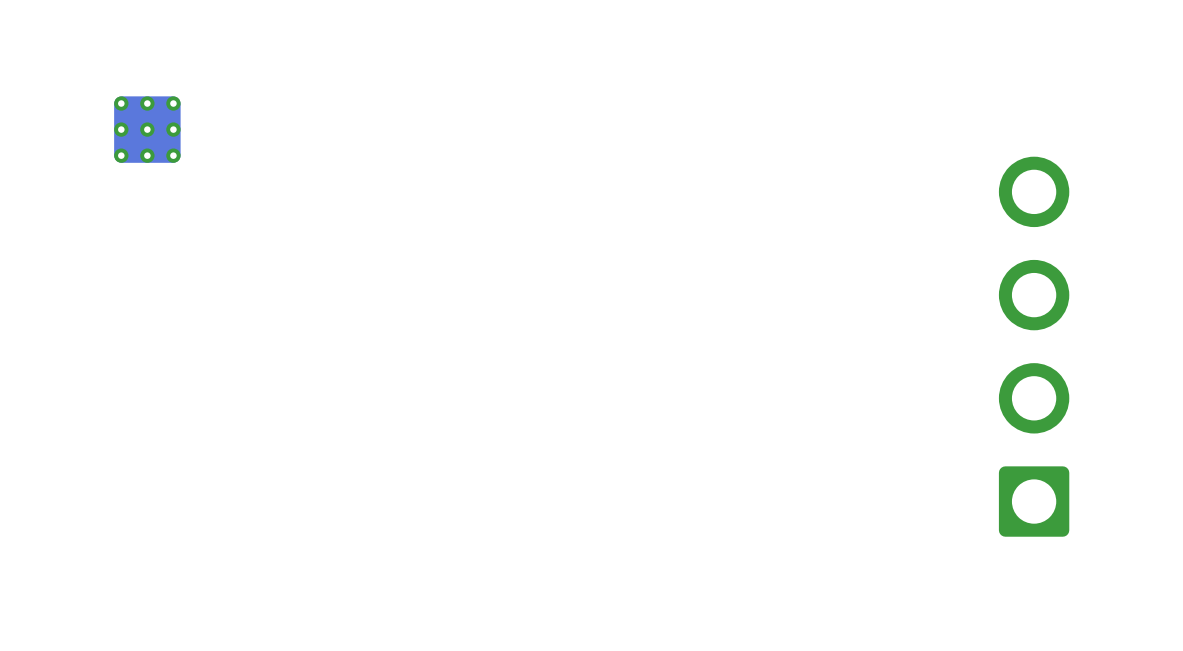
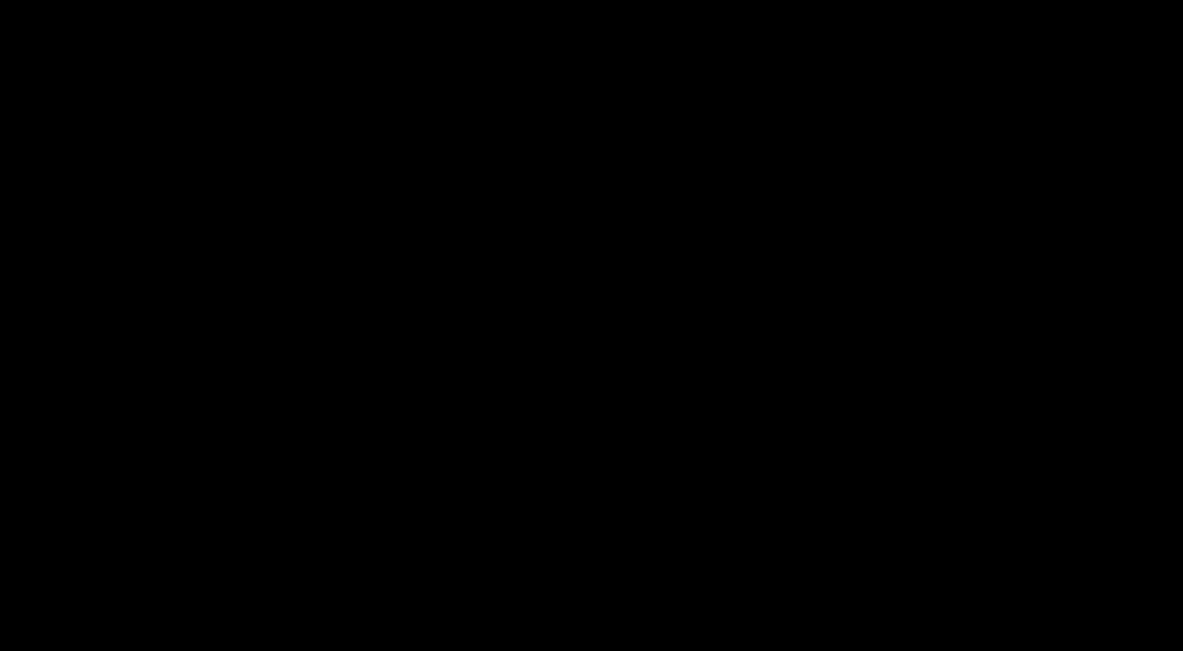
part: (147, 129) -> none
part: (1034, 346) -> none

